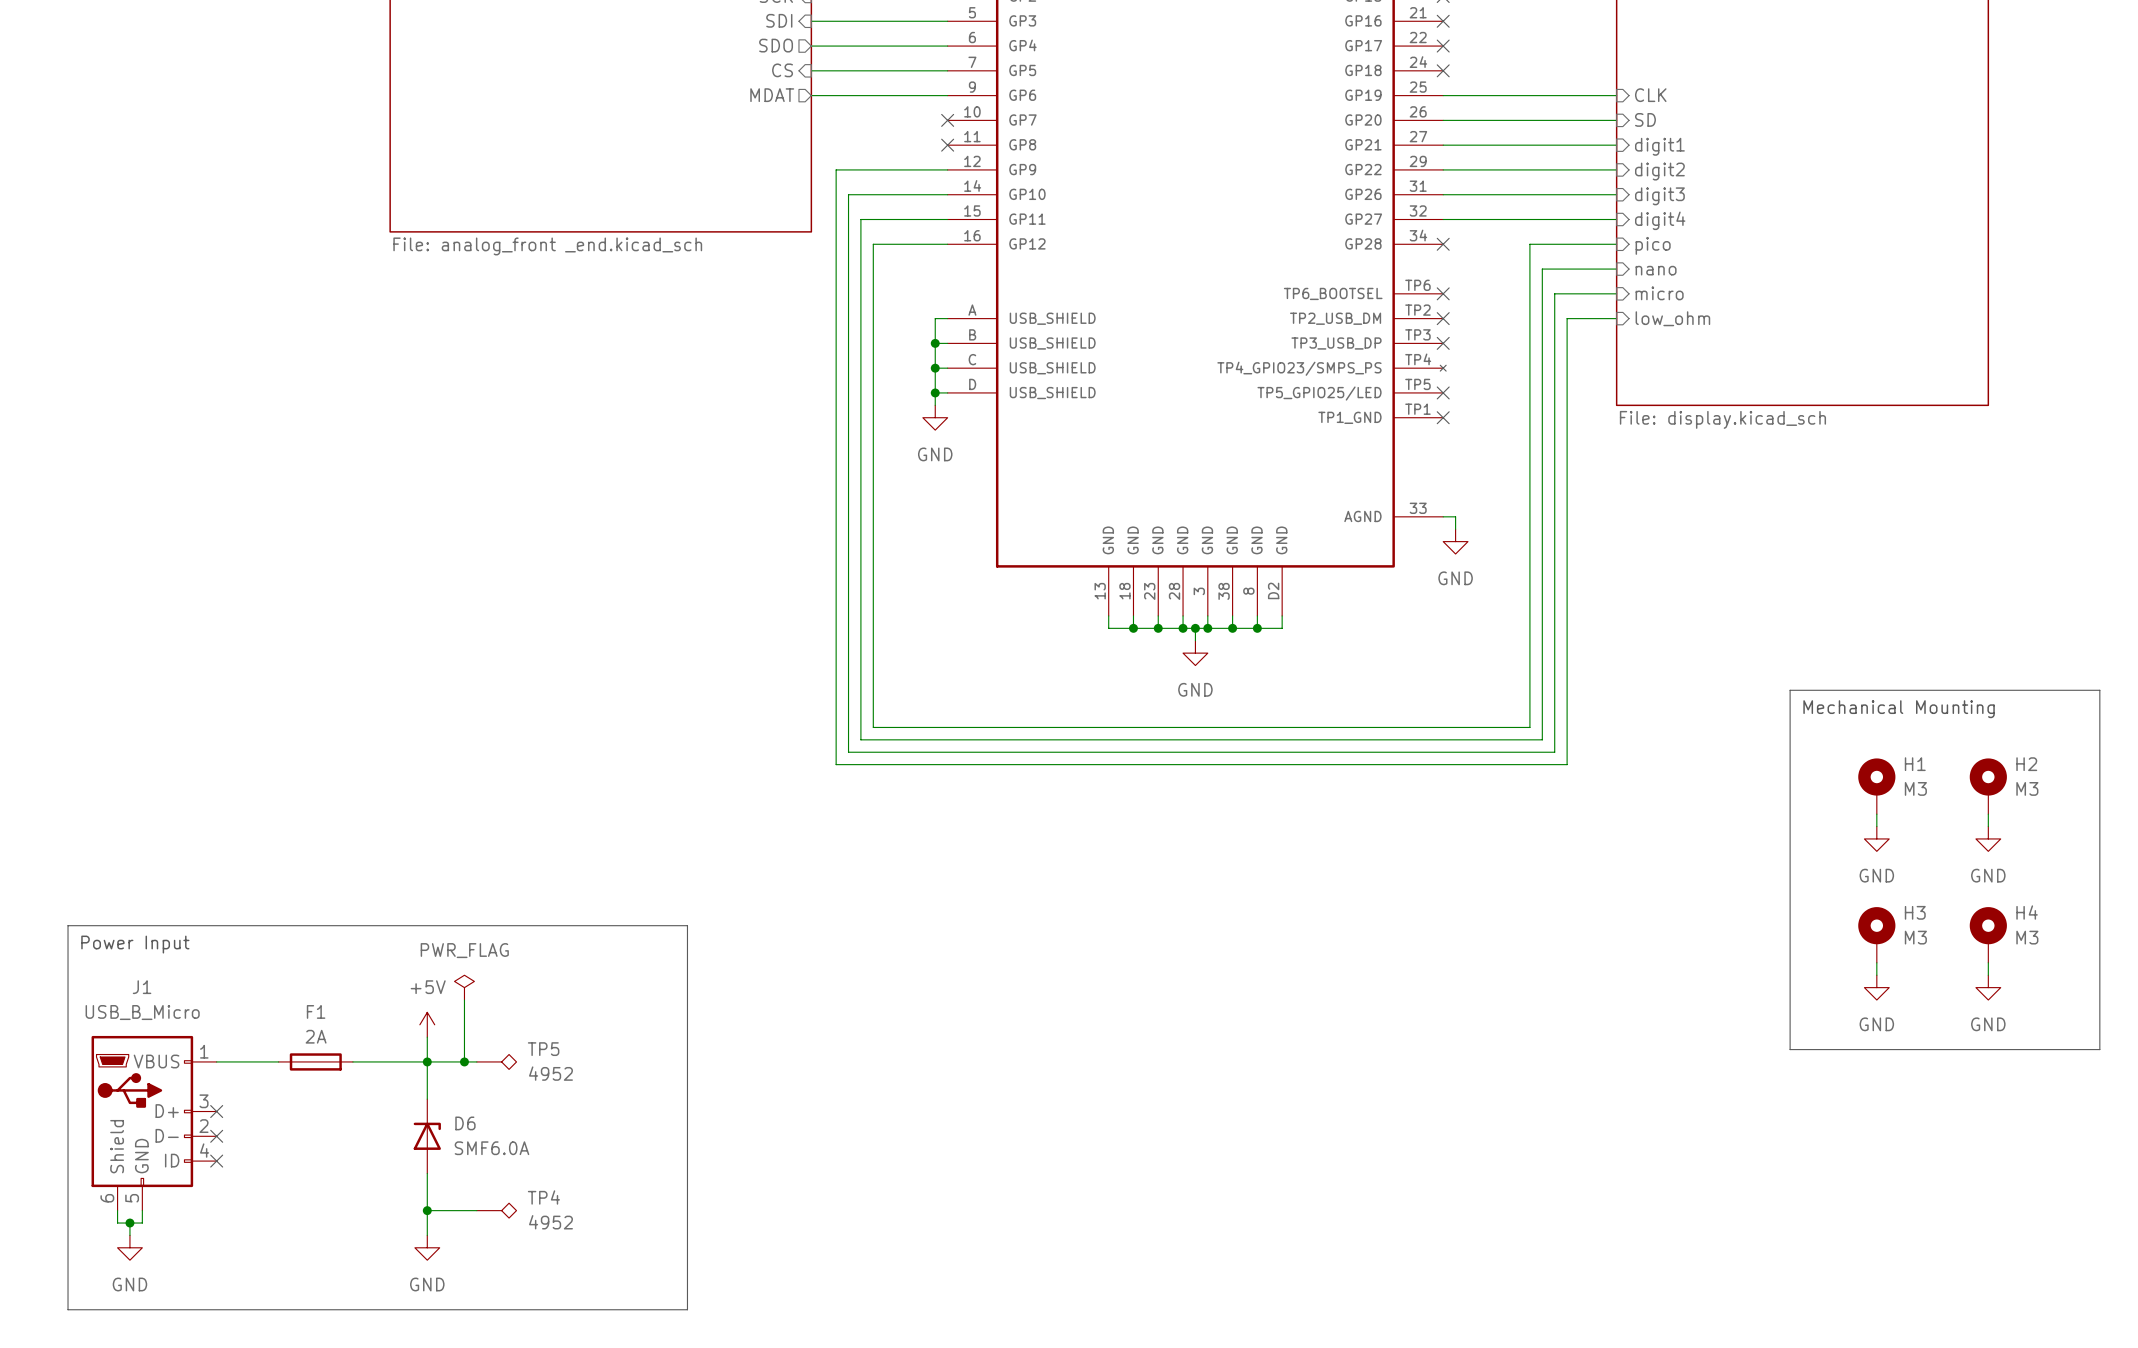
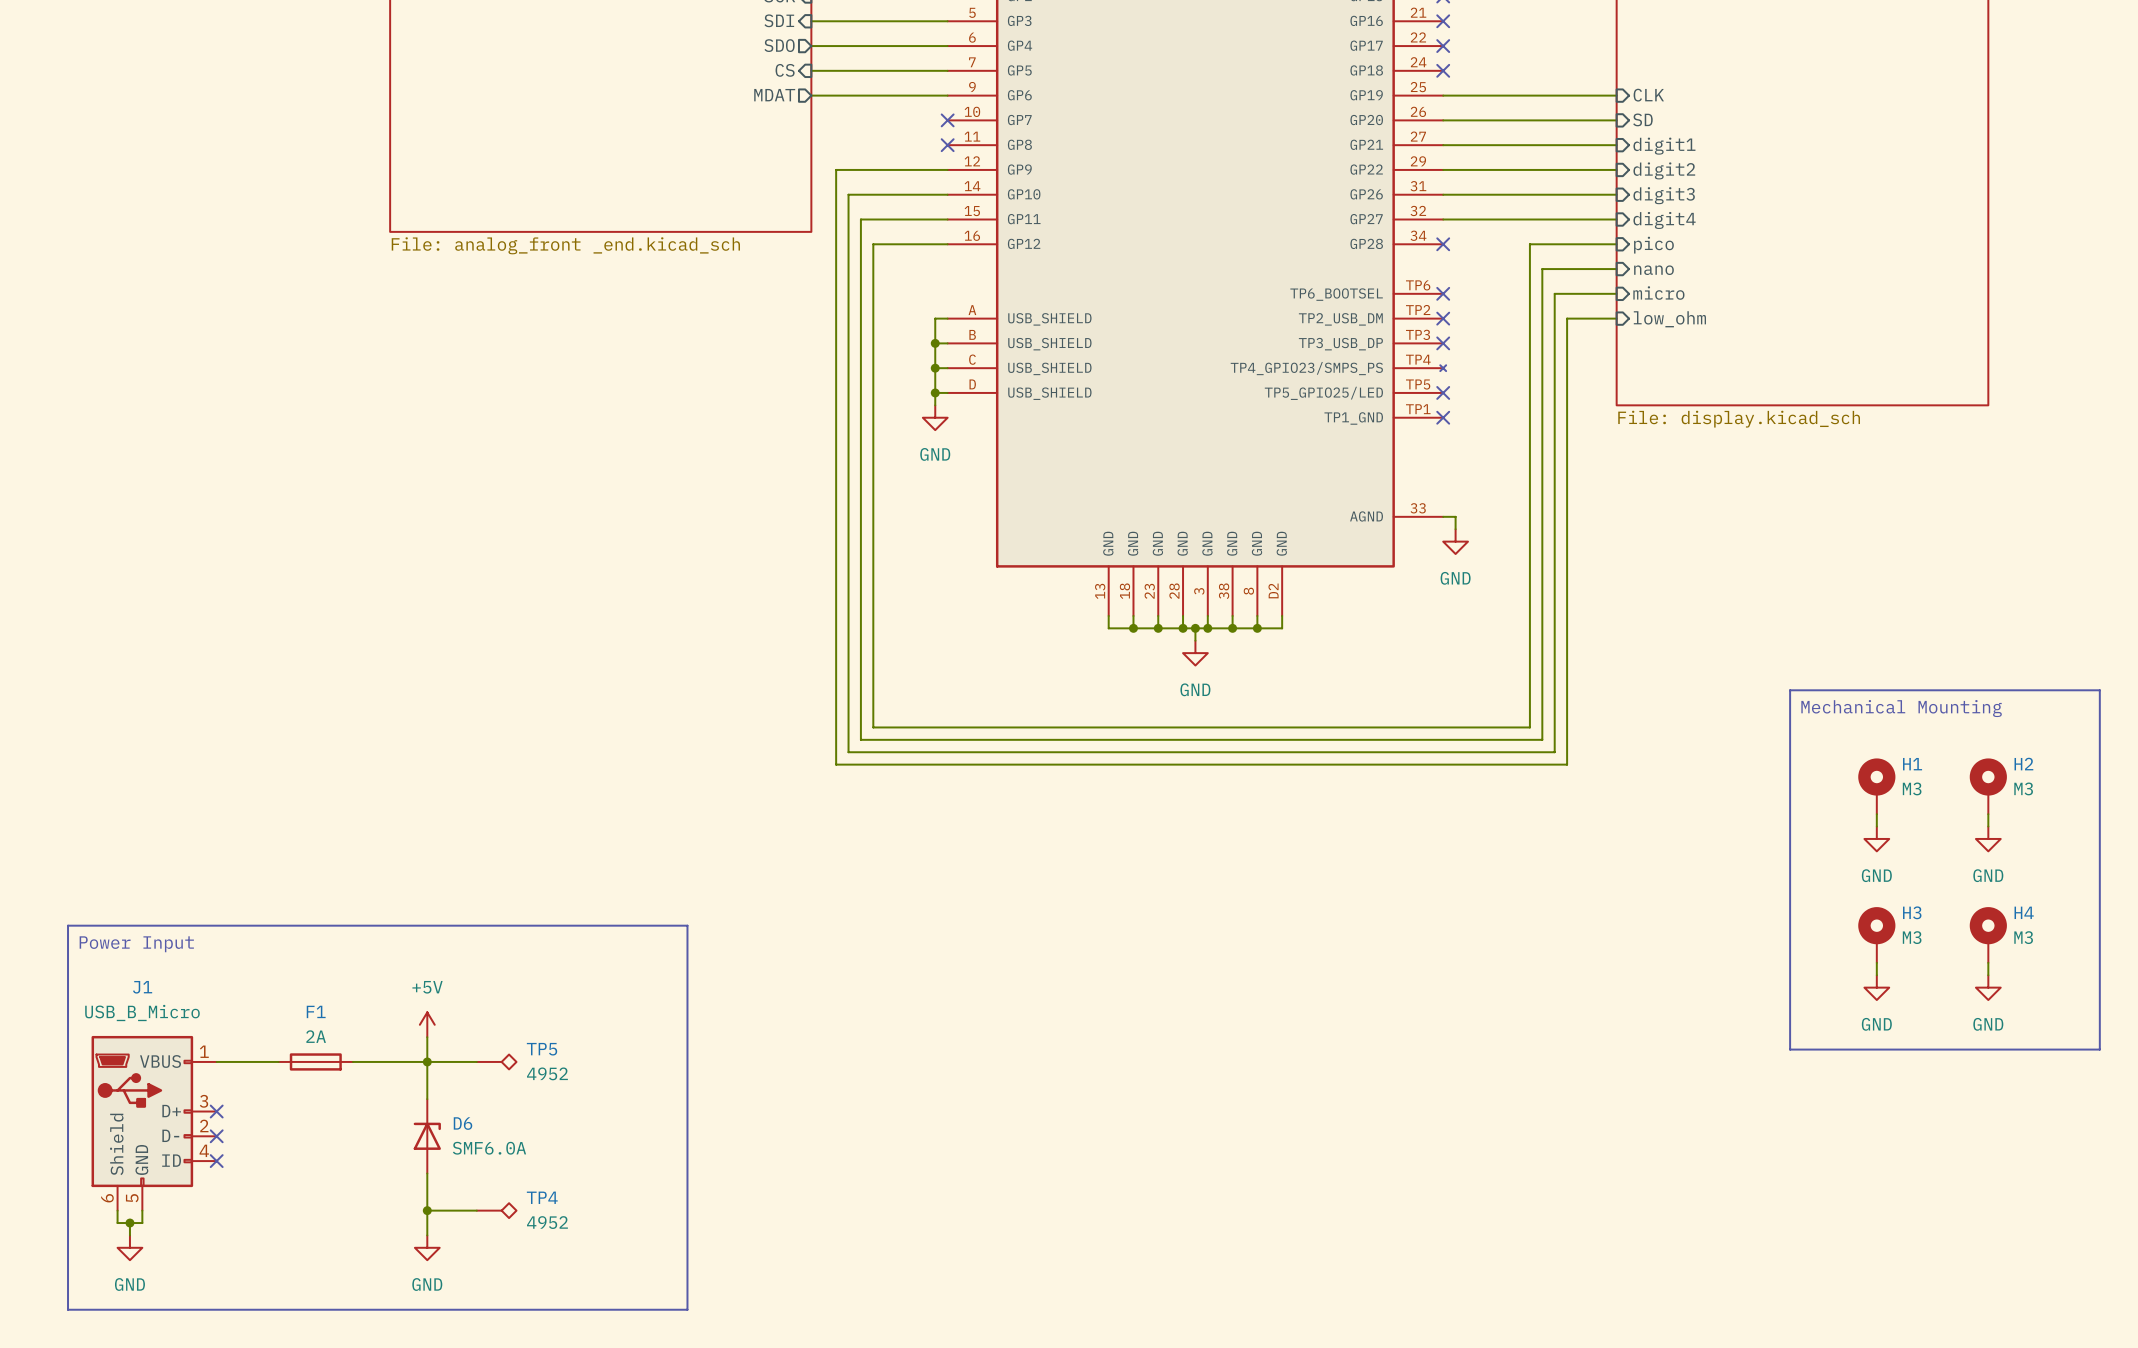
power symbol: PWR_FLAG (464, 987) -> none
wire: (464, 1000) (464, 1061) -> none
junction: (464, 1061) -> none

